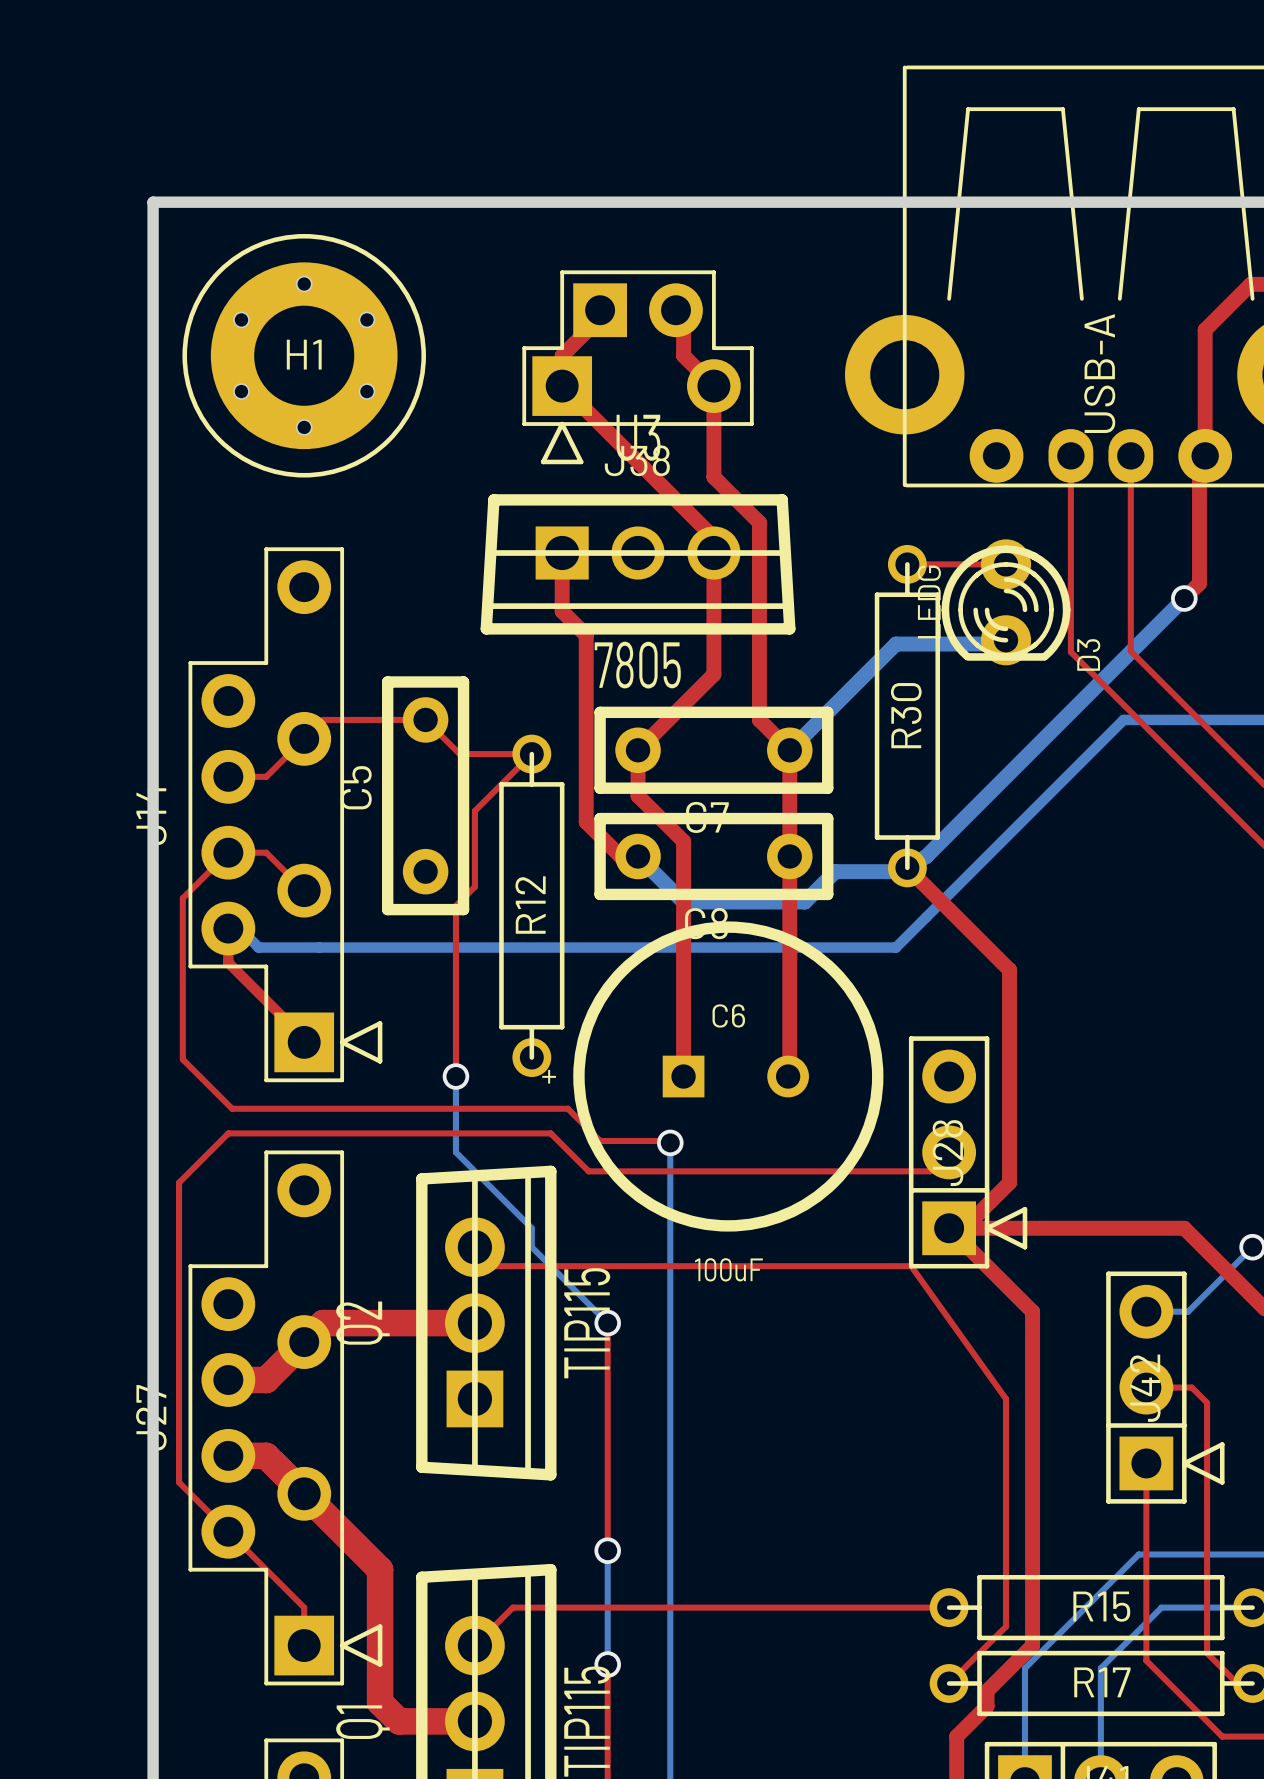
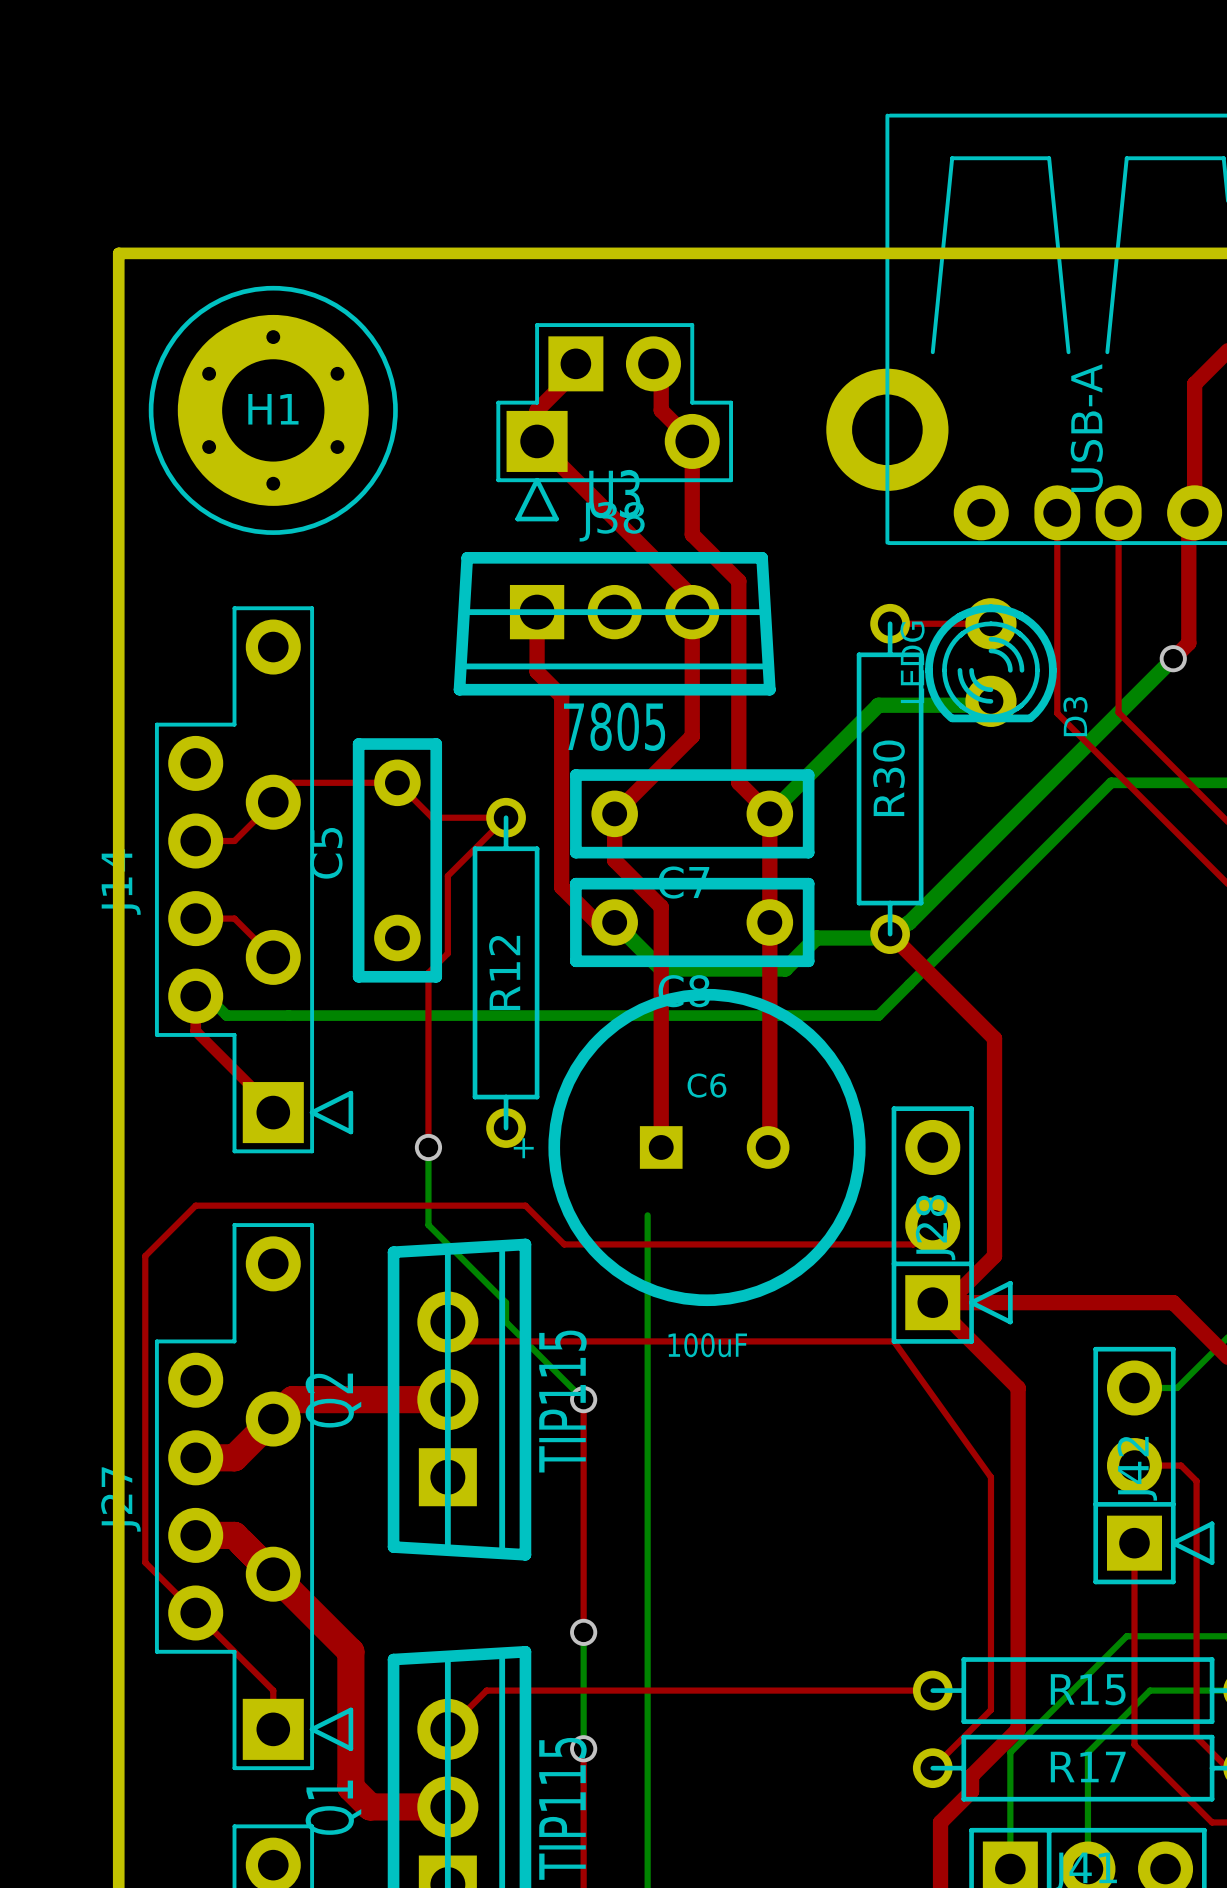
top track: (228, 852) (182, 898) (182, 1059) (232, 1108) (567, 1108) (600, 1141) (668, 1141) (670, 1142) -> none
via: (670, 1142) -> none

